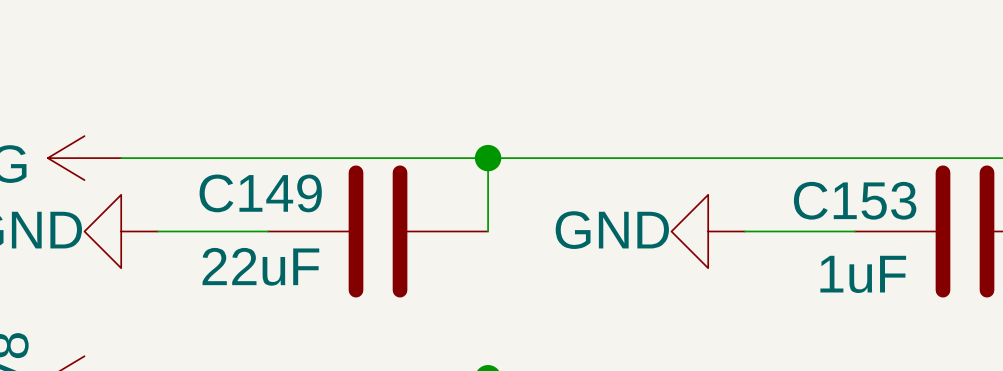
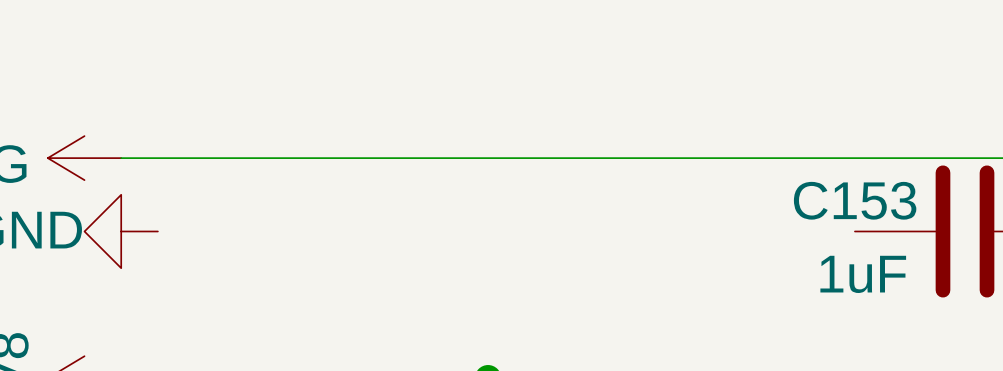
wire: (488, 158) (488, 231) -> none
junction: (488, 158) -> none
wire: (157, 231) (267, 231) -> none
C149: 22uF (378, 231) -> none
power symbol: GND (708, 231) -> none
wire: (744, 231) (854, 231) -> none

